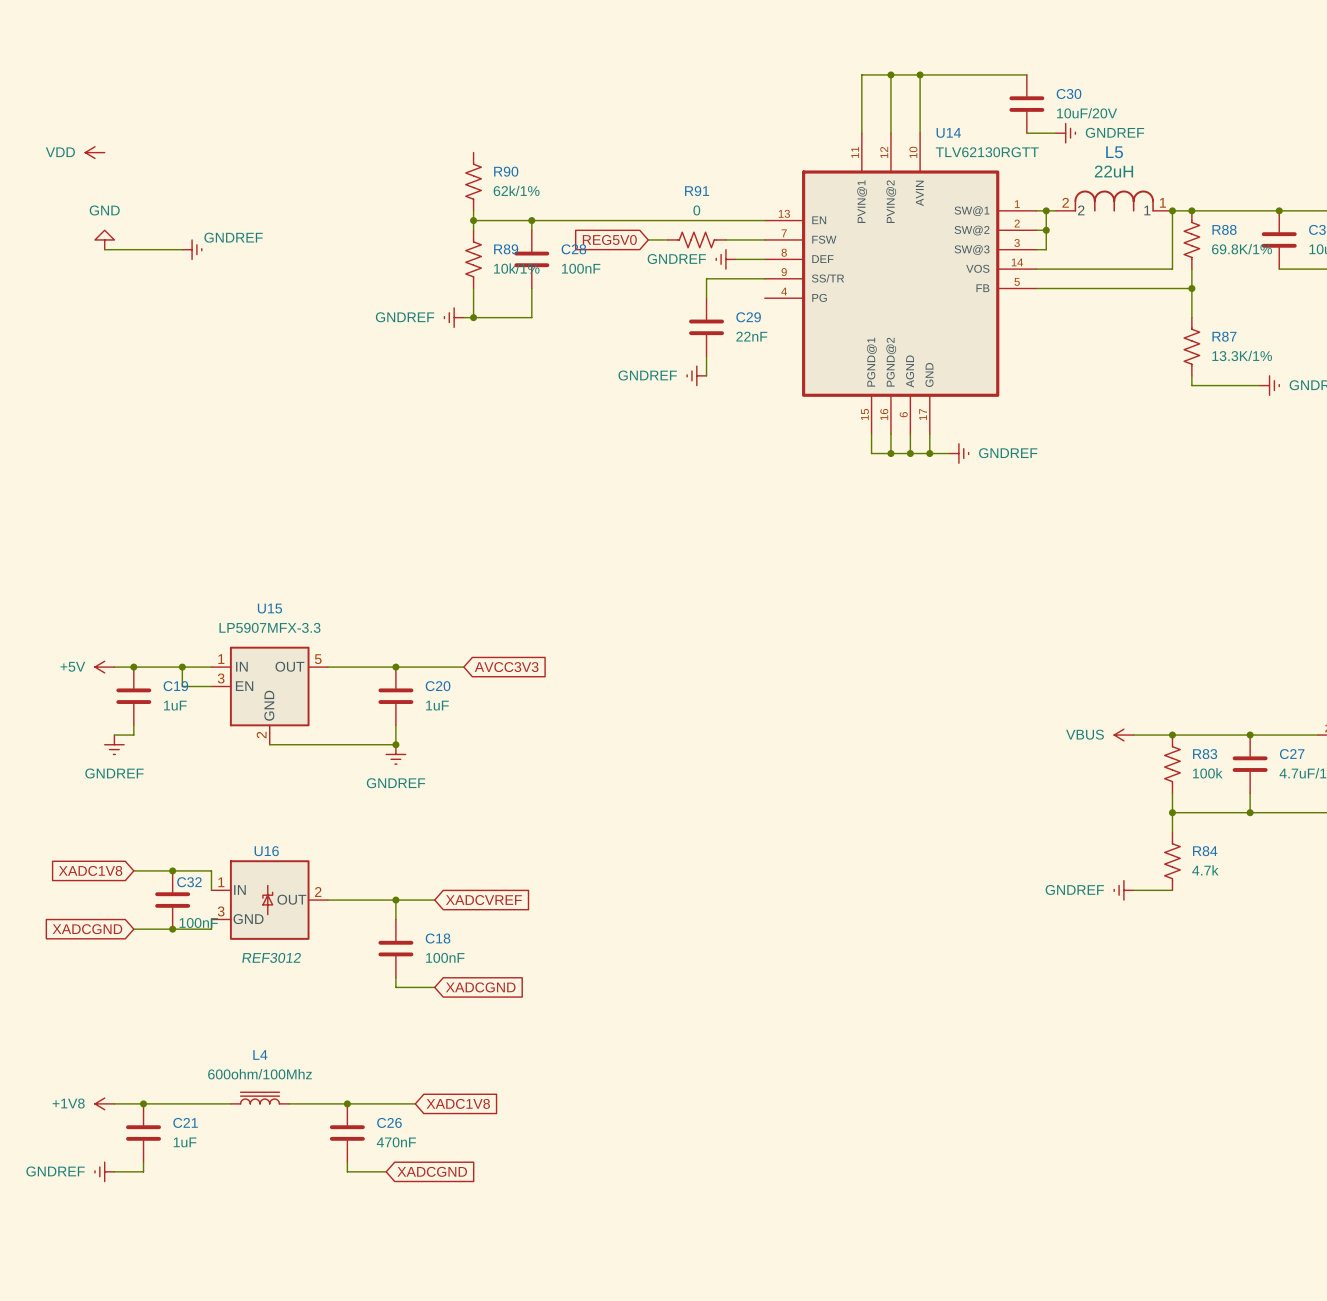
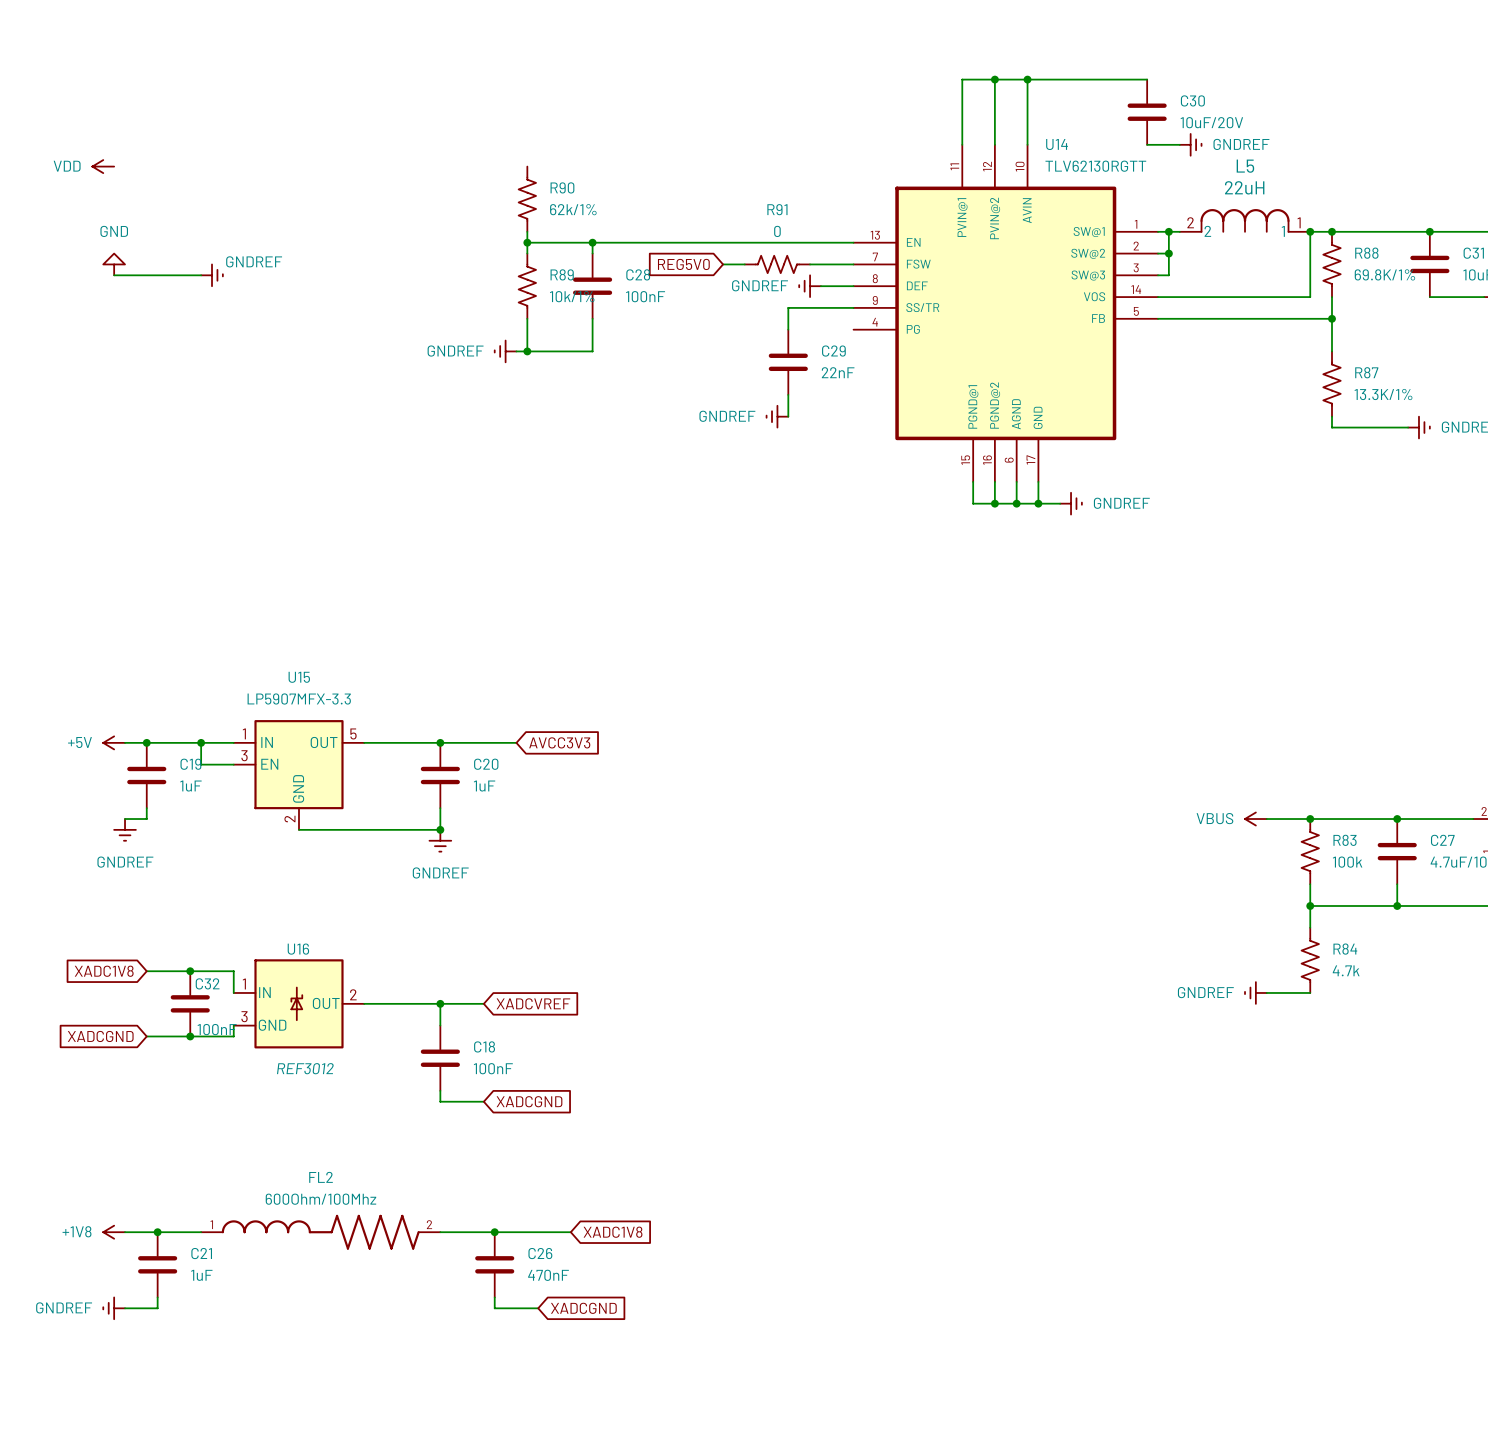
L4: 600ohm/100Mhz (260, 1098) -> none
wire: (182, 1103) (230, 1103) -> none
wire: (289, 1103) (395, 1103) -> none
FL2: none -> 600Ohm/100Mhz (320, 1232)
junction: (347, 1103) -> none
wire: none -> (462, 1232) (570, 1232)
junction: none -> (494, 1232)
global label position: XADC1V8 (458, 1103) -> XADC1V8 (613, 1232)
C26 position: (347, 1133) -> (494, 1264)
wire: (347, 1162) (347, 1171) (386, 1171) -> (494, 1297) (494, 1308) (538, 1308)
global label position: XADCGND (432, 1171) -> XADCGND (583, 1308)

